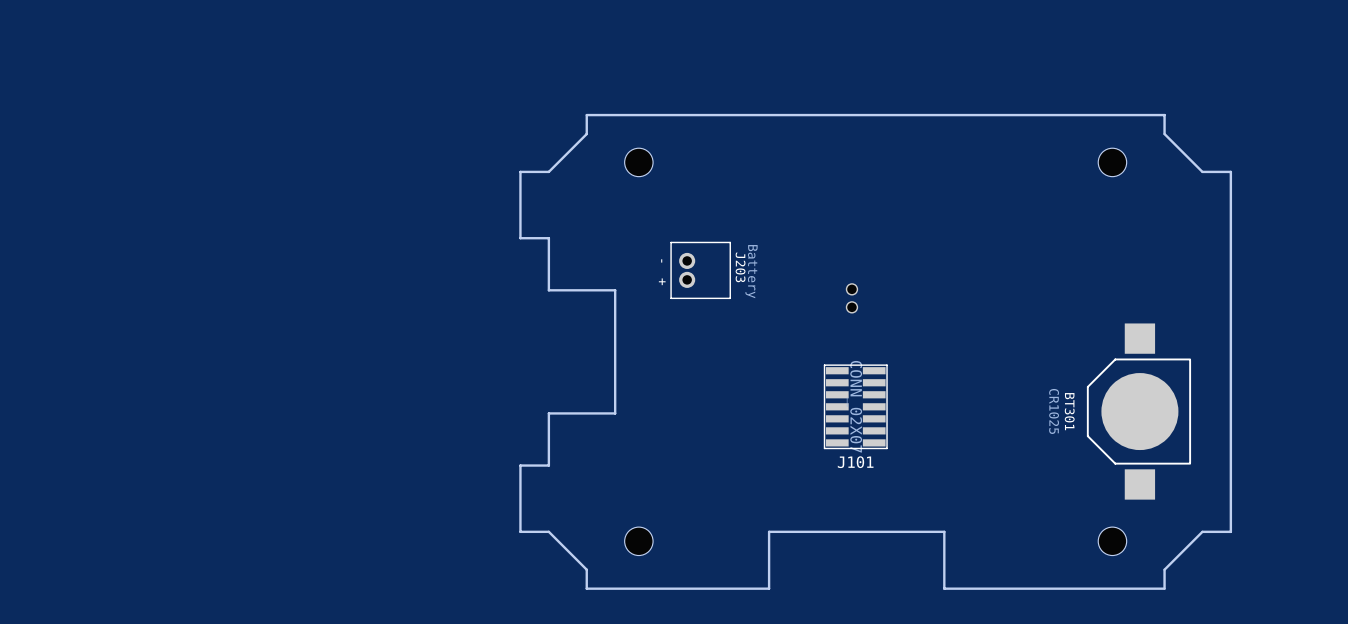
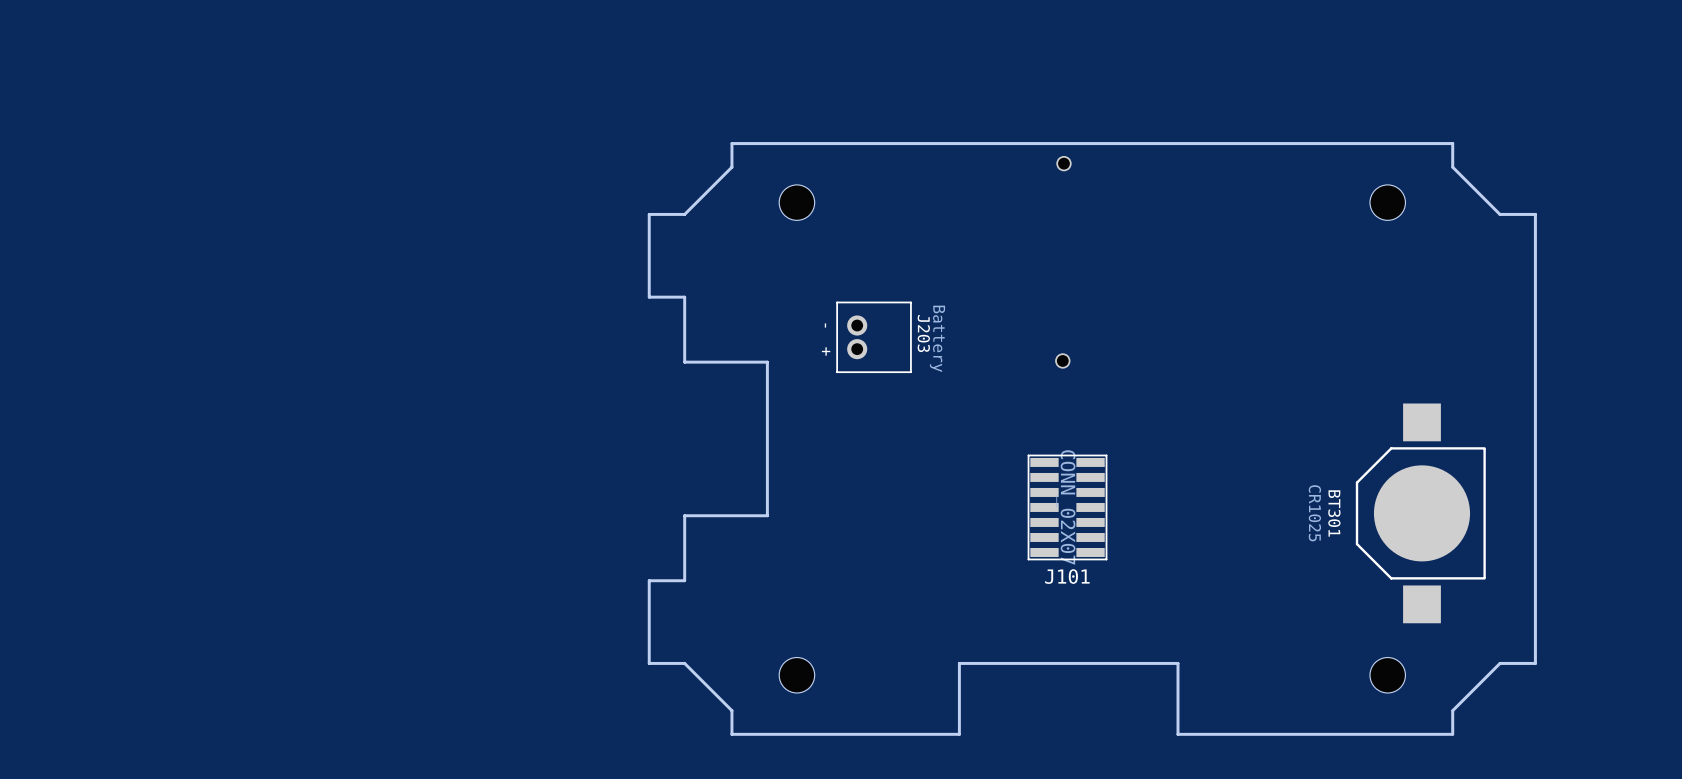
part position: (851, 307) -> (1063, 163)

